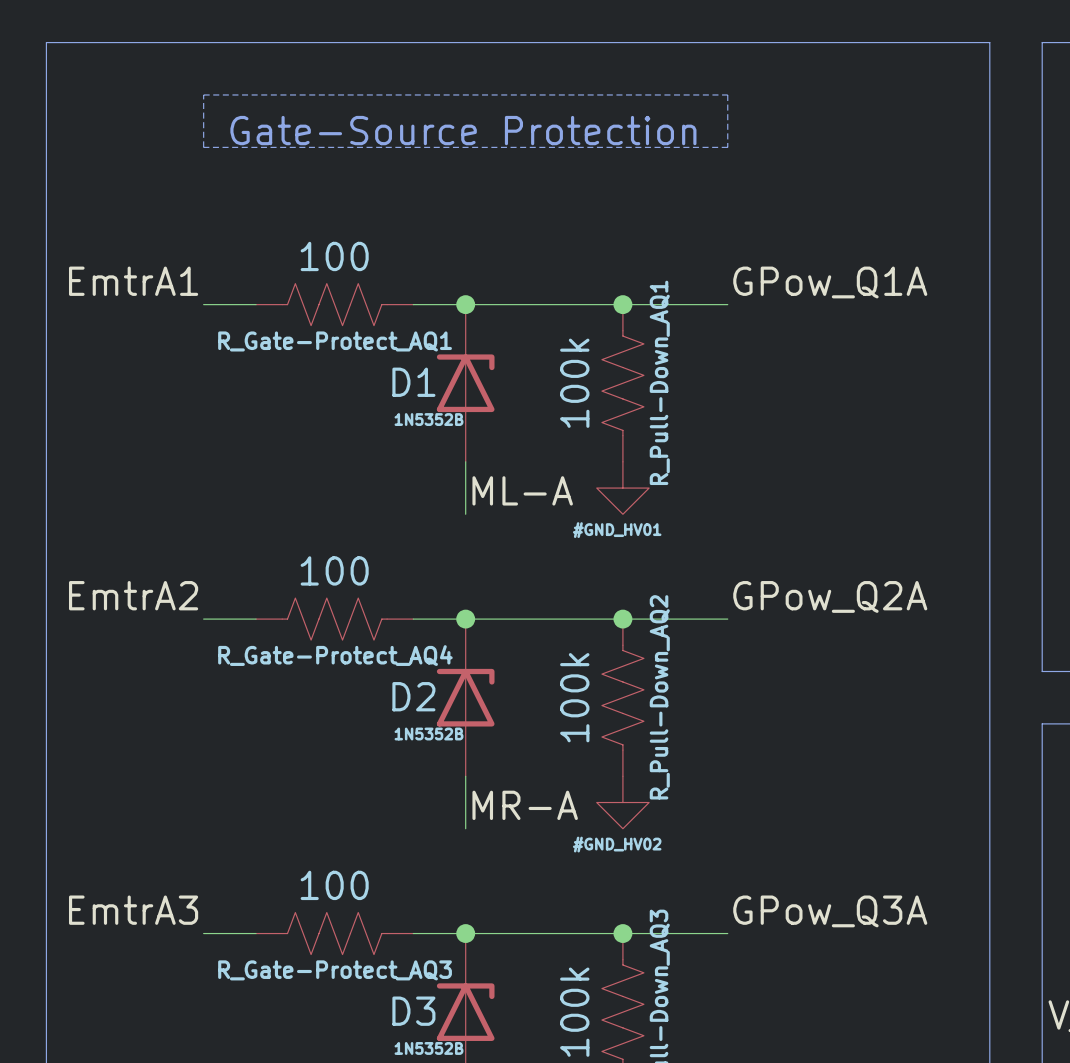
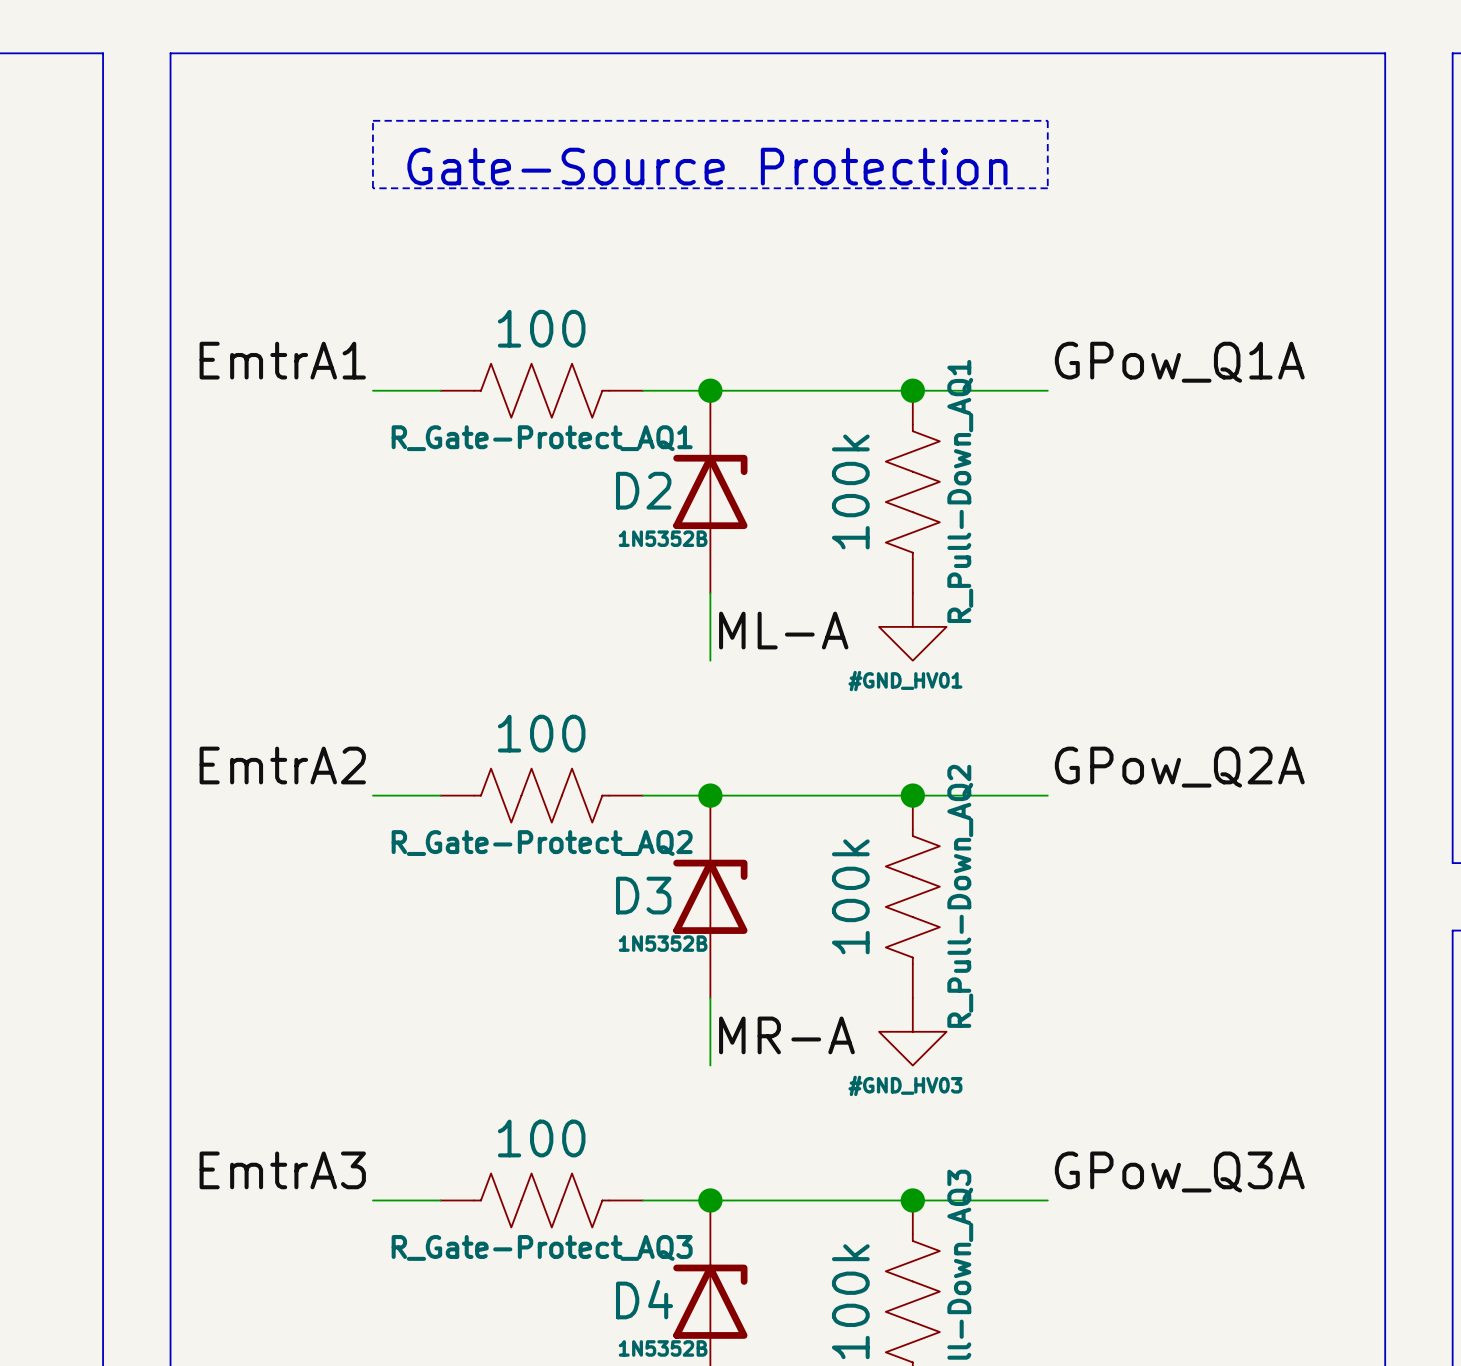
D1 name: D1 (413, 382) -> D2 (643, 490)
R_Gate-Protect_AQ4 name: R_Gate-Protect_AQ4 (335, 655) -> R_Gate-Protect_AQ2 (542, 843)
D2 name: D2 (413, 696) -> D3 (643, 895)
#GND_HV02 name: #GND_HV02 (617, 844) -> #GND_HV03 (905, 1085)
D3 name: D3 (413, 1011) -> D4 (644, 1299)

